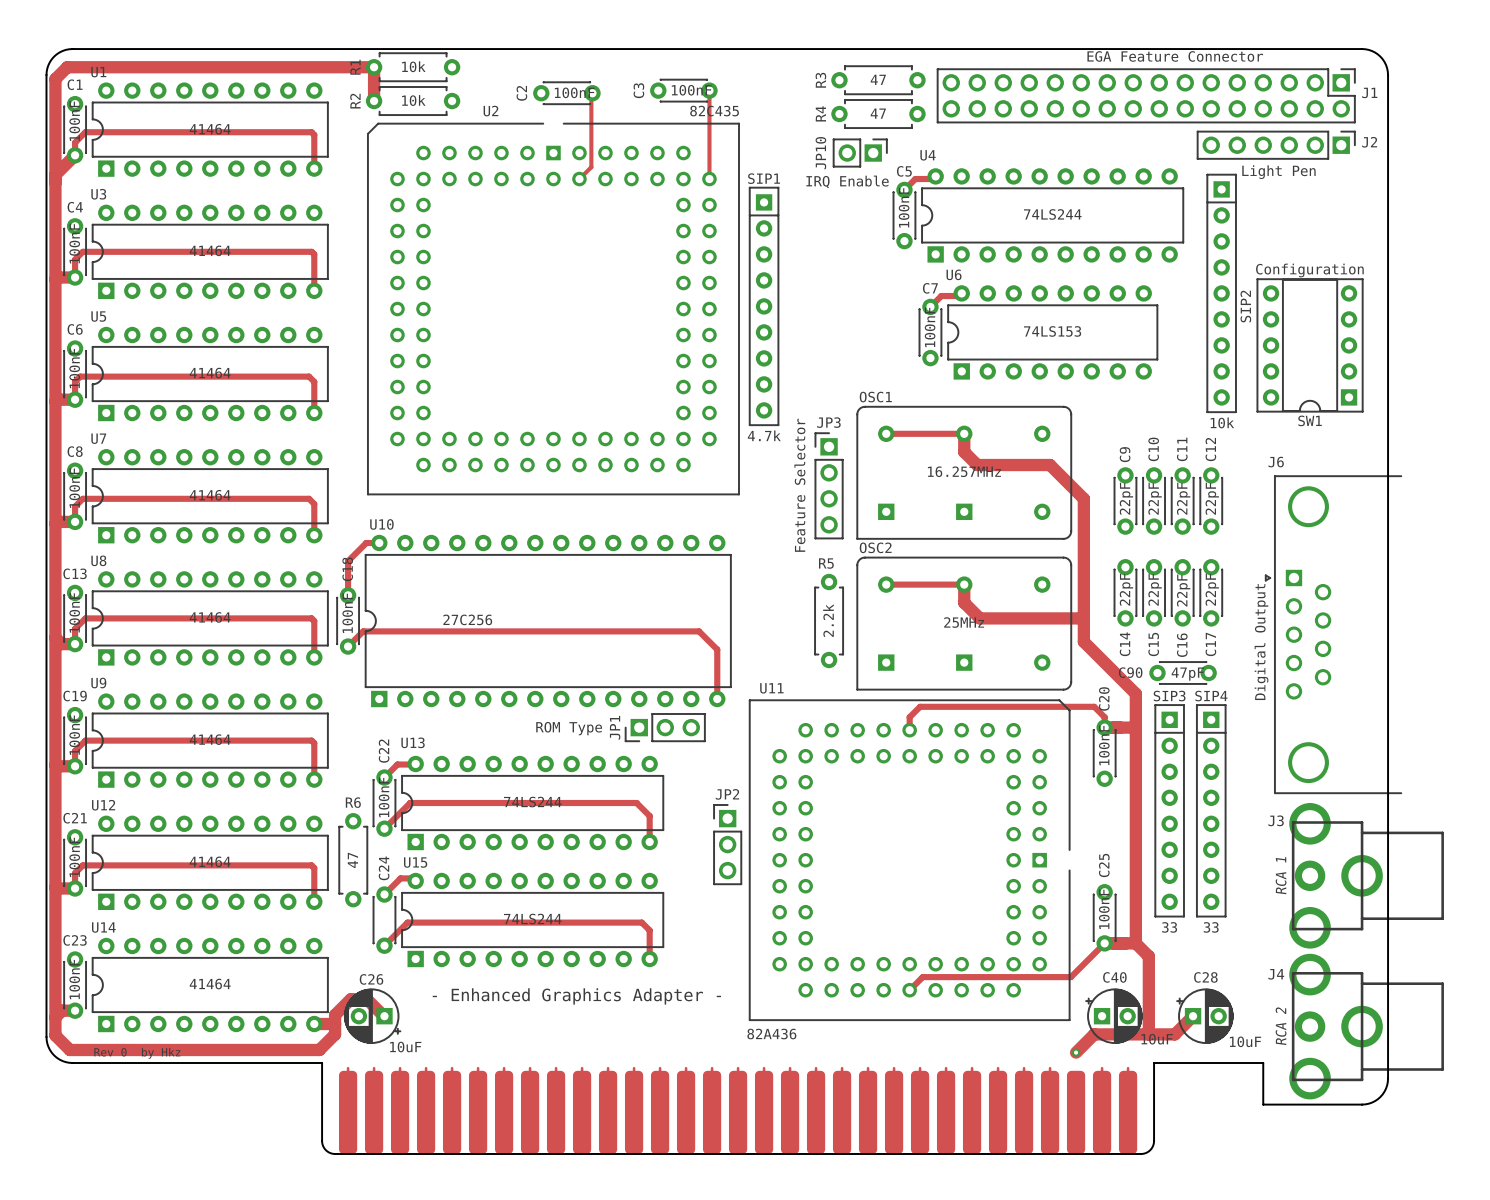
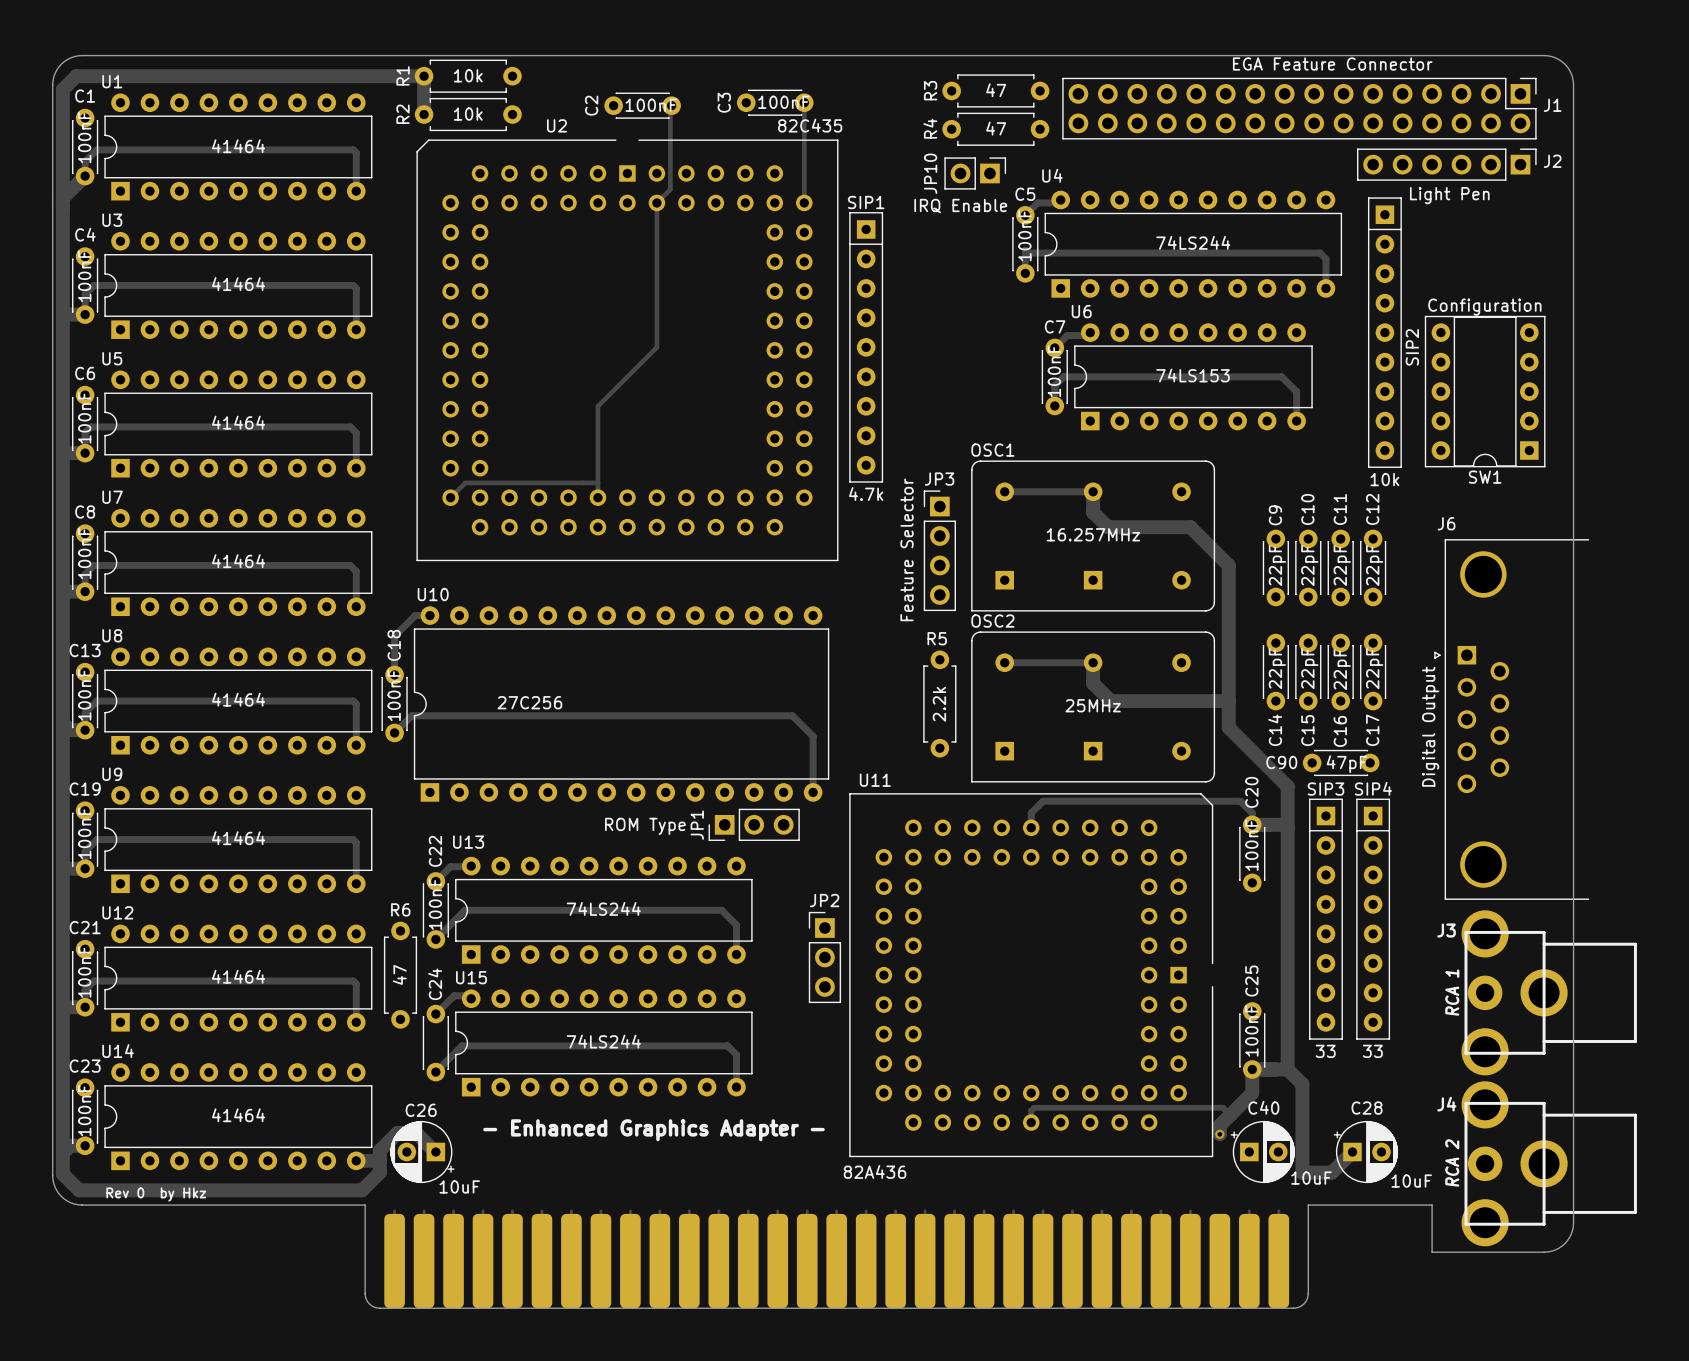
track: none -> (656, 202) (656, 347) (597, 406) (597, 497)
track: none -> (1025, 273) (1025, 250) (1028, 253) (1320, 253) (1325, 258) (1325, 288)
track: none -> (1054, 405) (1054, 385) (1063, 376) (1281, 376) (1296, 391) (1296, 421)
track: none -> (597, 482) (465, 482) (450, 497)
track: (1104, 943) (1070, 977) (922, 977) (909, 990) -> (1230, 1115) (1222, 1107) (1034, 1107) (1031, 1110) (1031, 1122)
track: none -> (1252, 1075) (1252, 1069) (1252, 1093) (1219, 1125) (1219, 1134)
track: (1148, 1034) (1094, 1034) (1076, 1052) -> none
via position: (1076, 1052) -> (1219, 1134)

